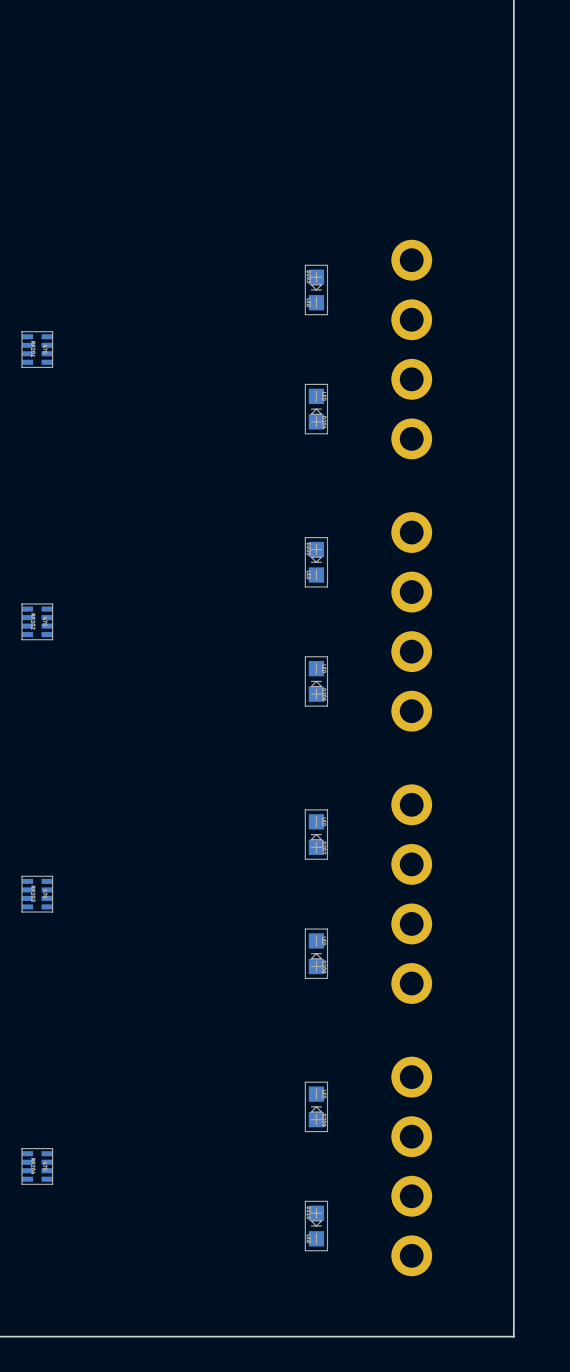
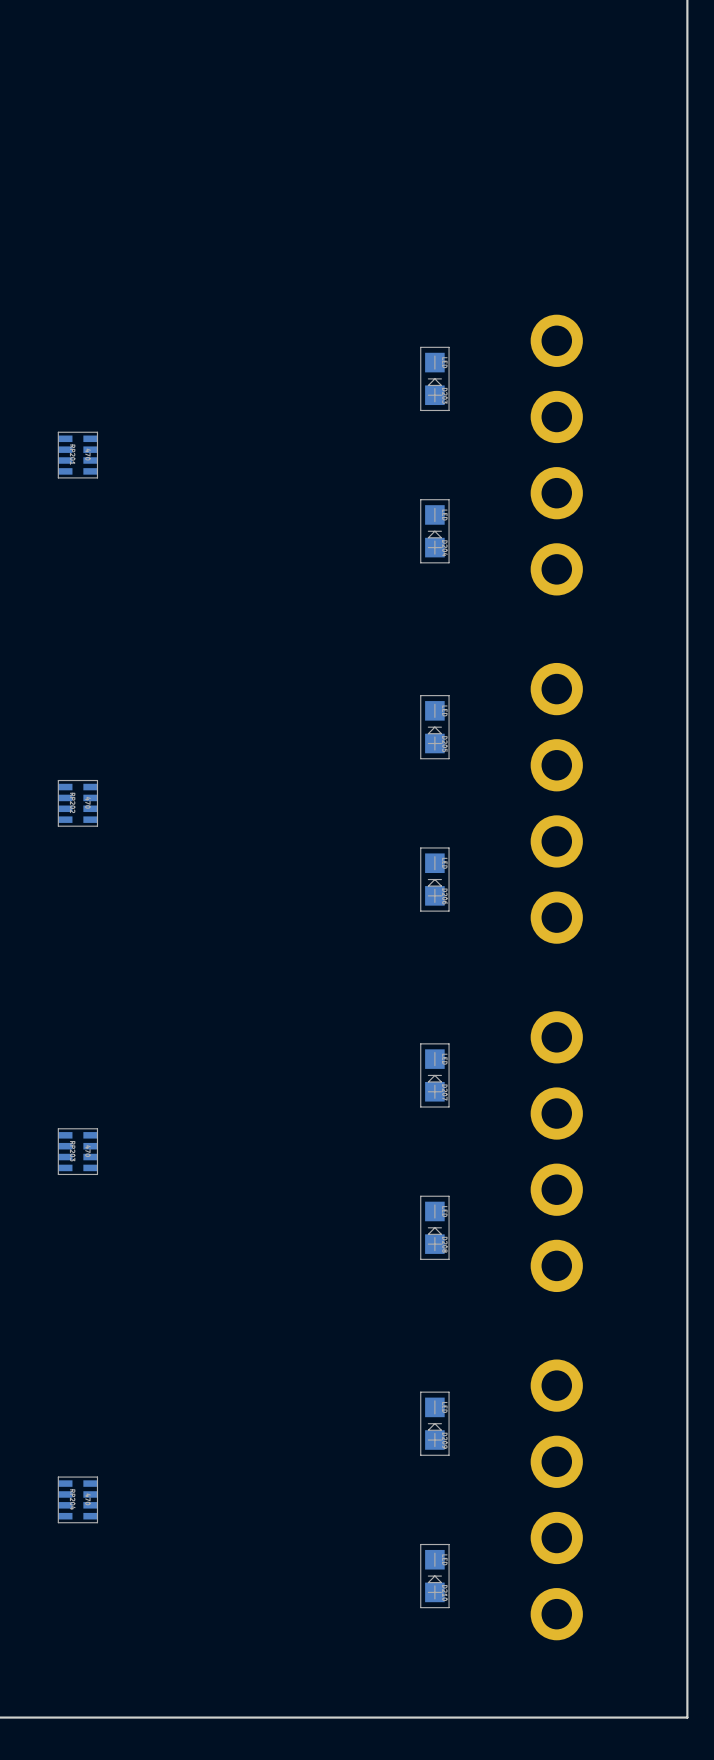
part rotation: 0° (316, 289) -> 180° (434, 378)
part rotation: 0° (316, 562) -> 180° (434, 727)
part rotation: 0° (316, 1226) -> 180° (434, 1576)

